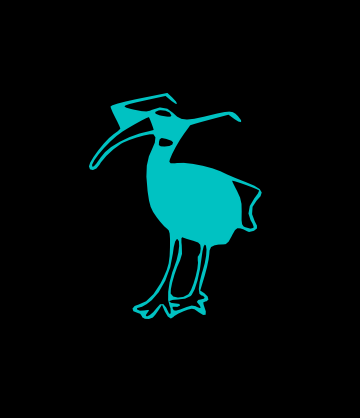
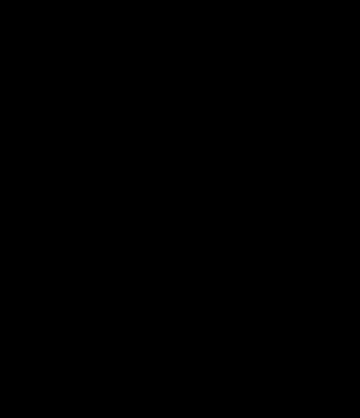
drawing: [88, 92, 262, 319] -> none

